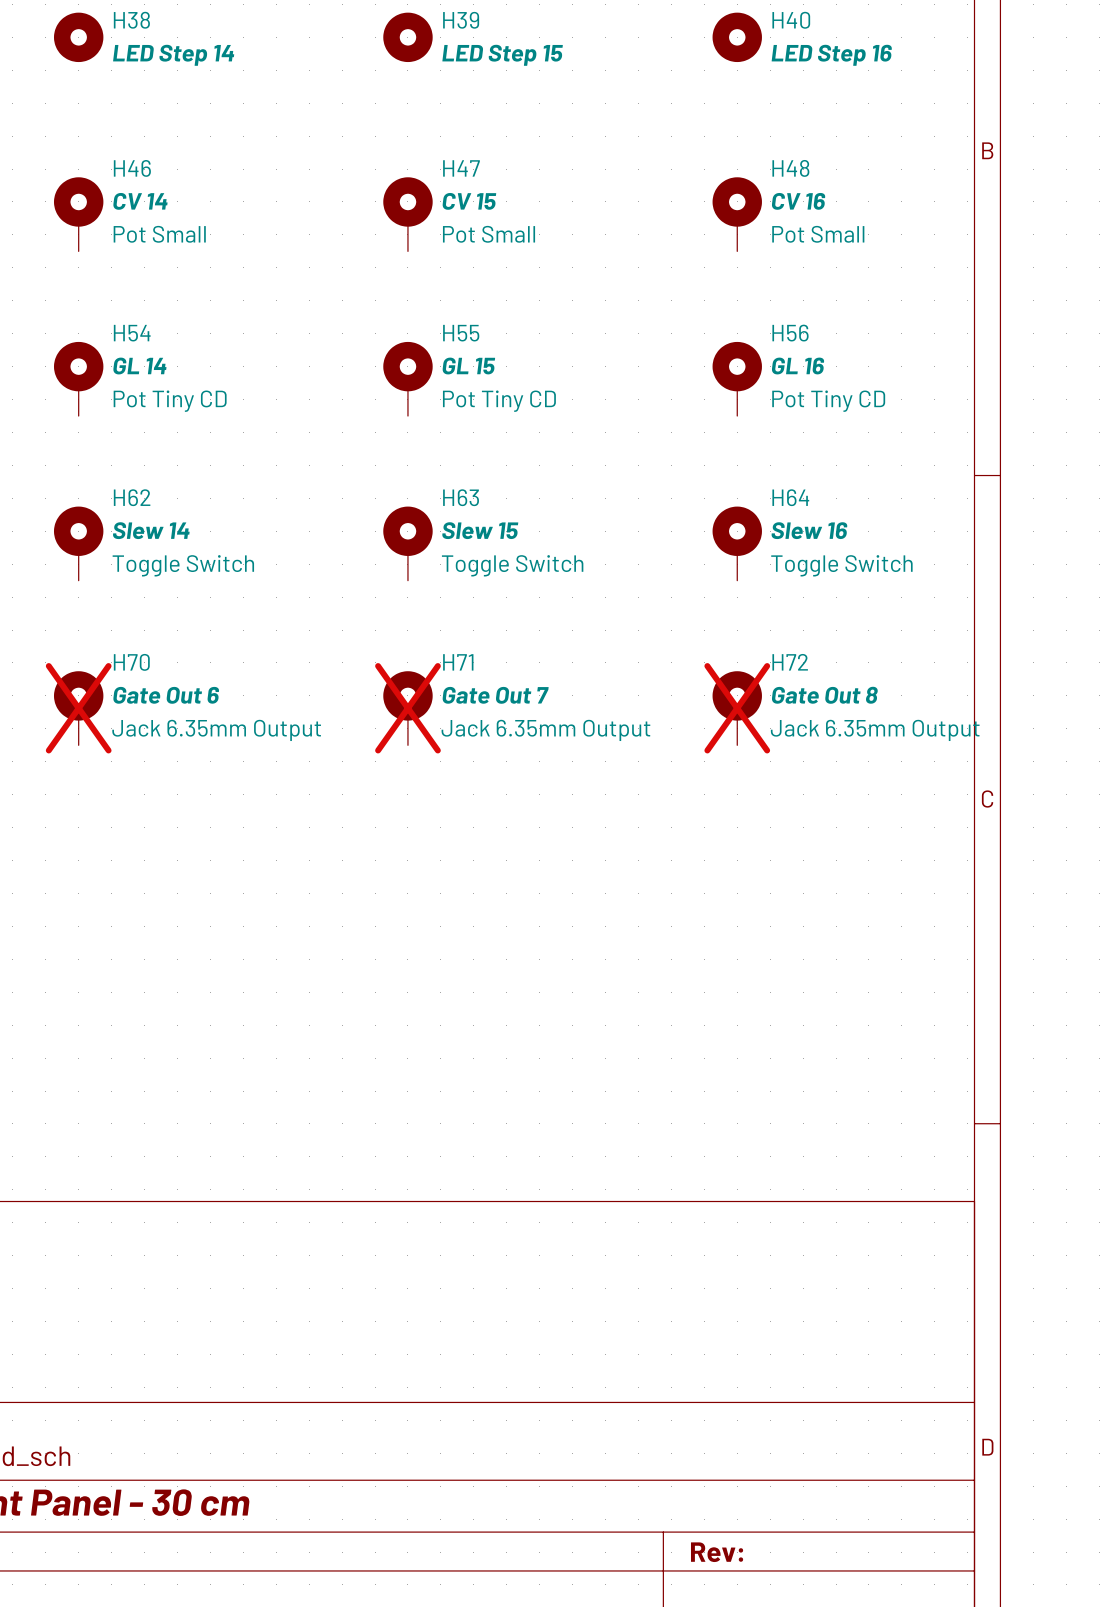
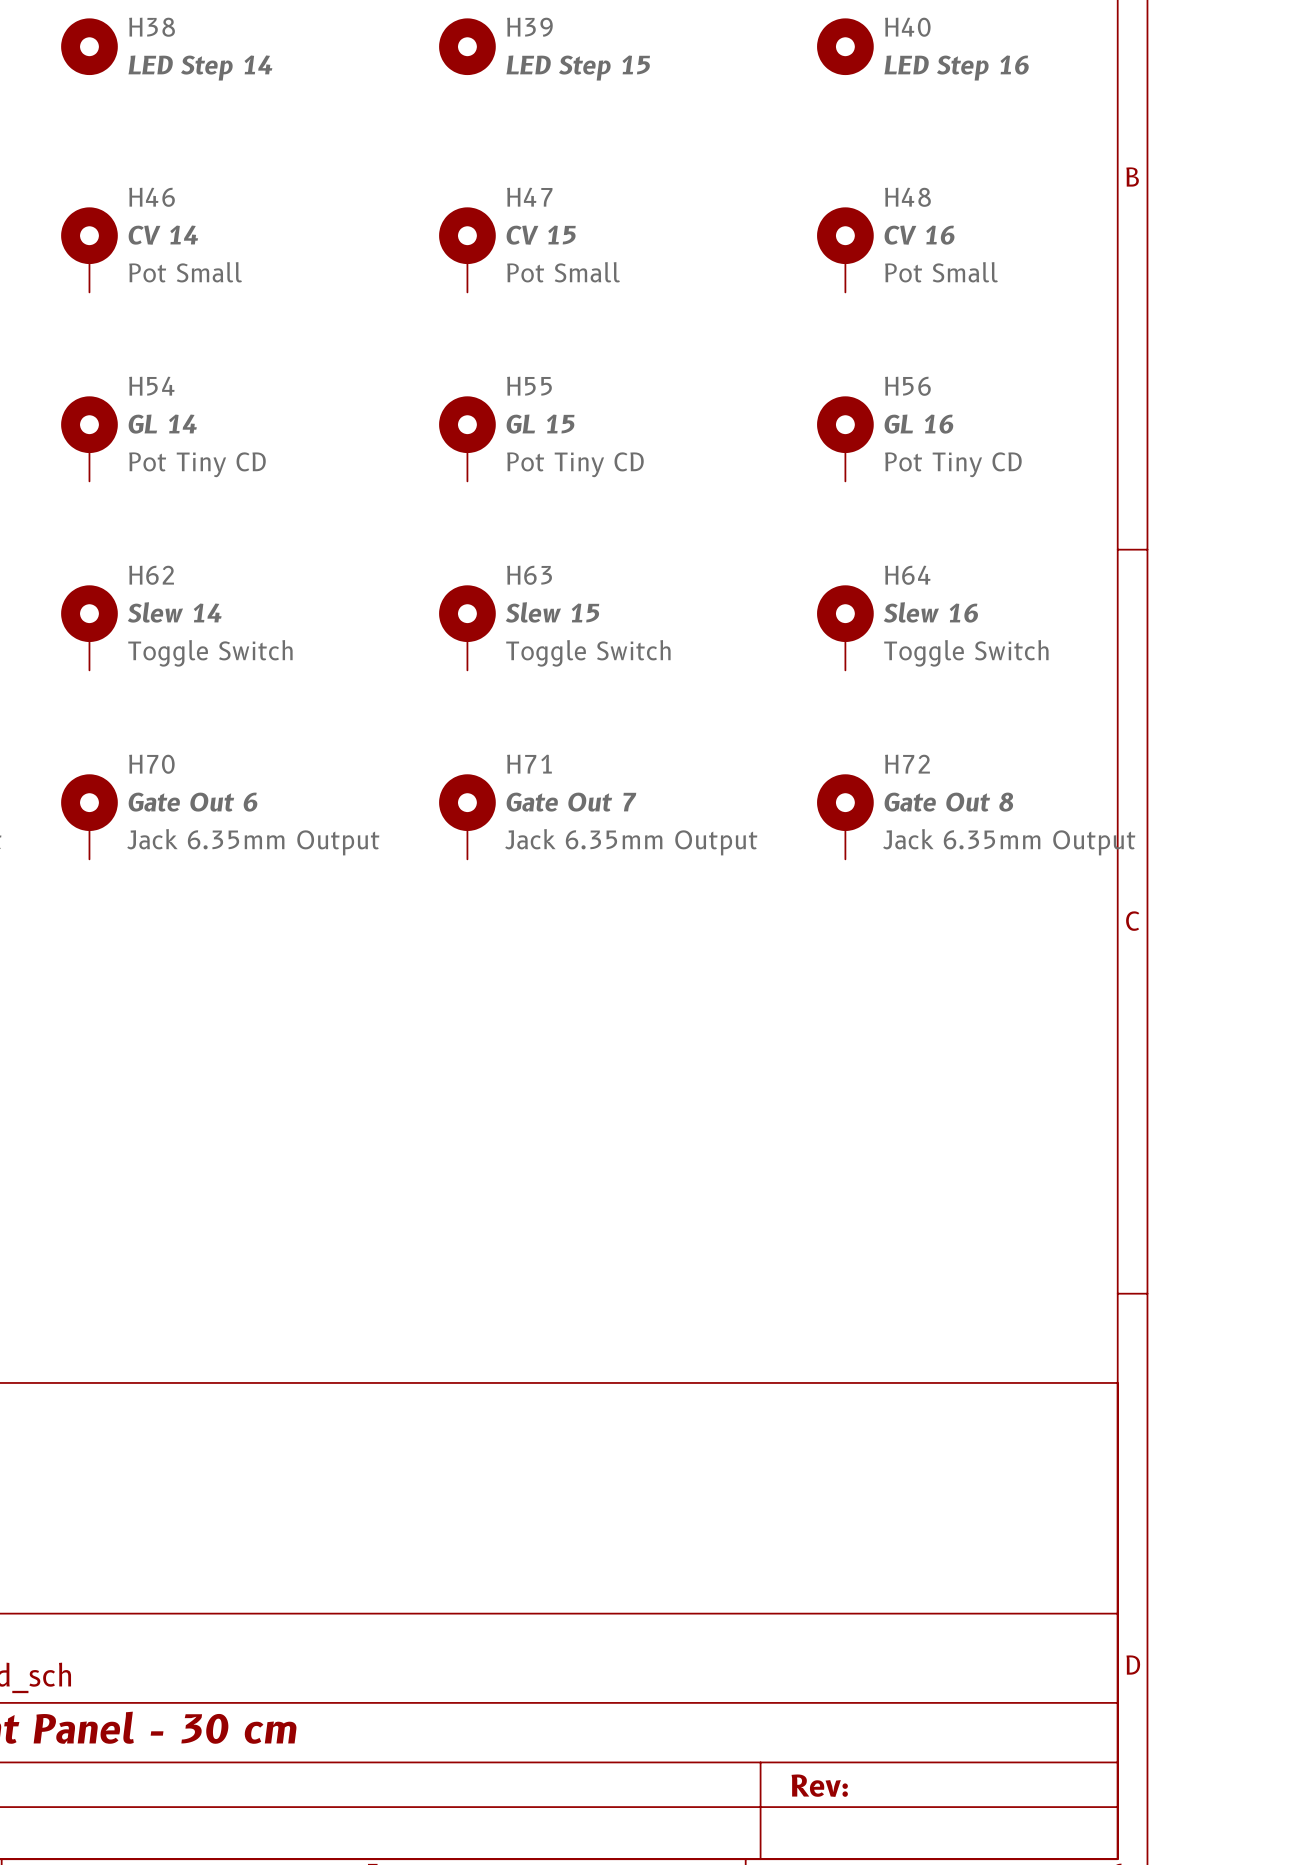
H70 do-not-place cross: (78, 708) -> none
H71 do-not-place cross: (407, 708) -> none
H72 do-not-place cross: (737, 708) -> none

